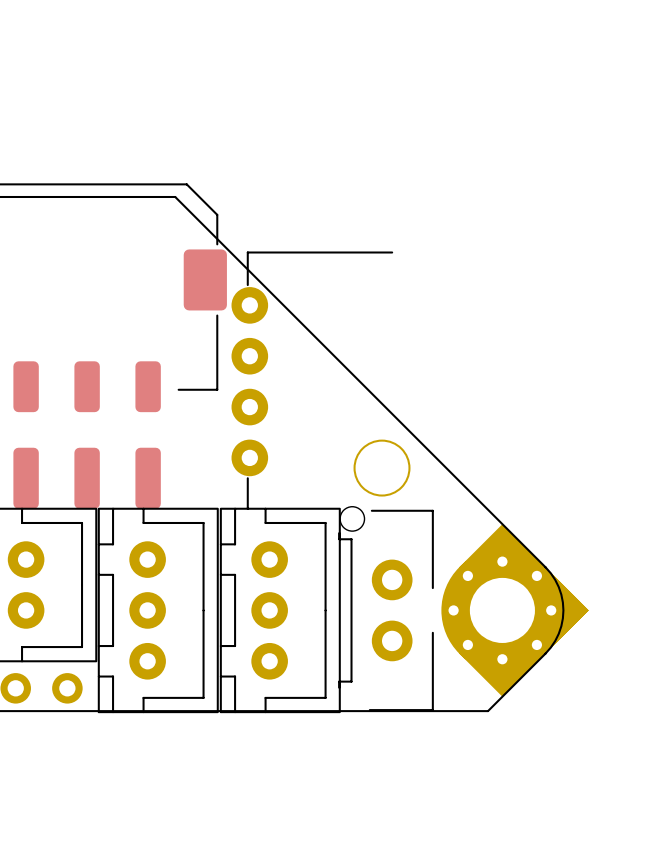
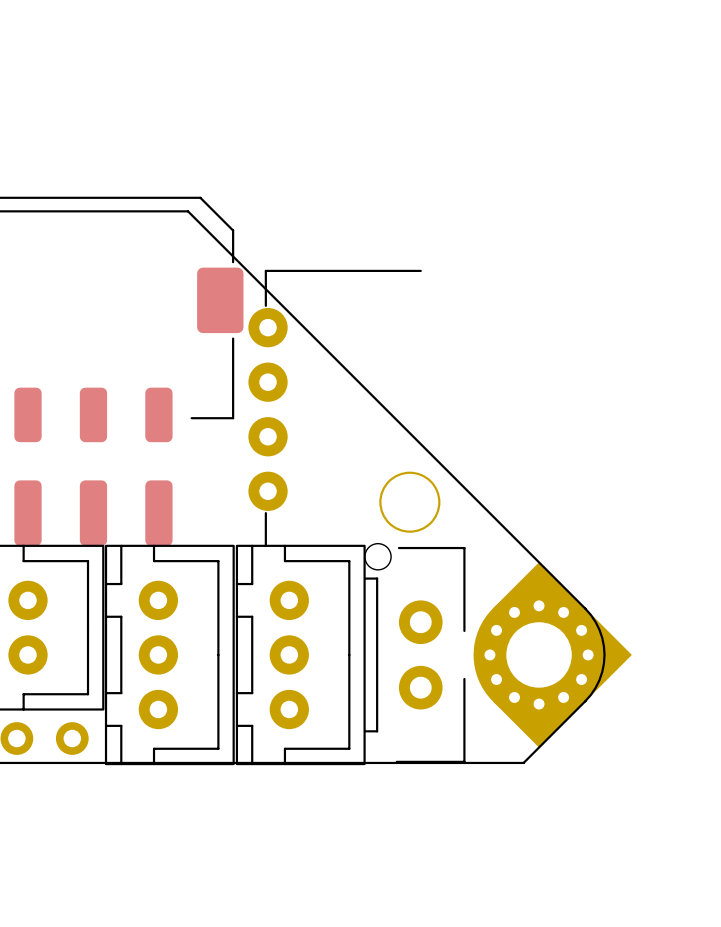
part footprint: [338, 506, 434, 731] -> [364, 543, 466, 784]
part footprint: [441, 524, 589, 697] -> [473, 562, 632, 748]

